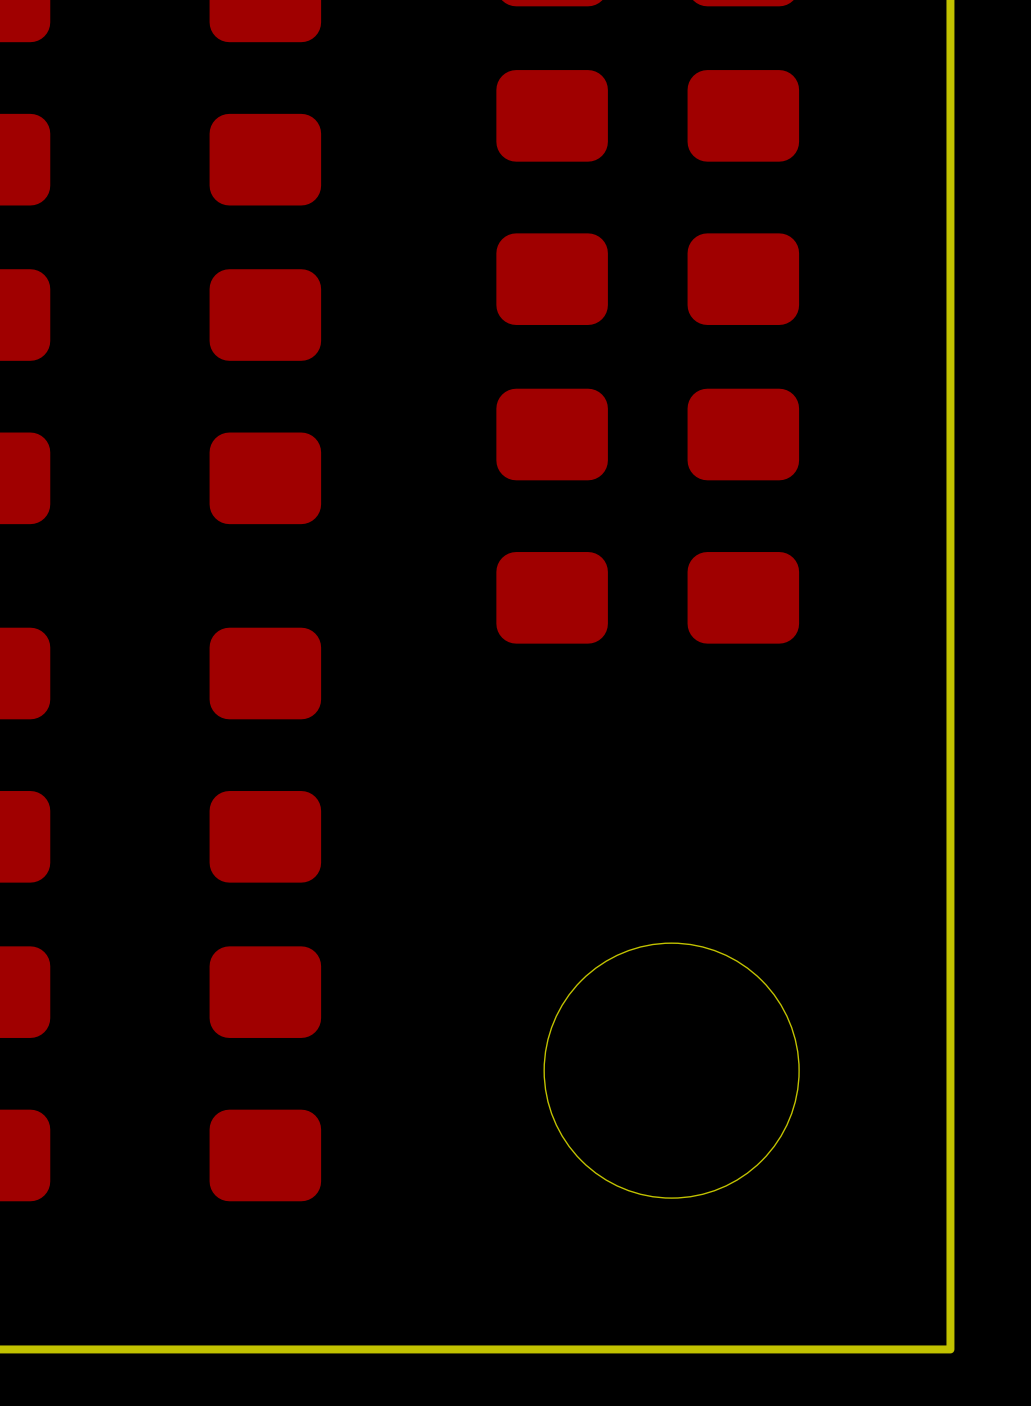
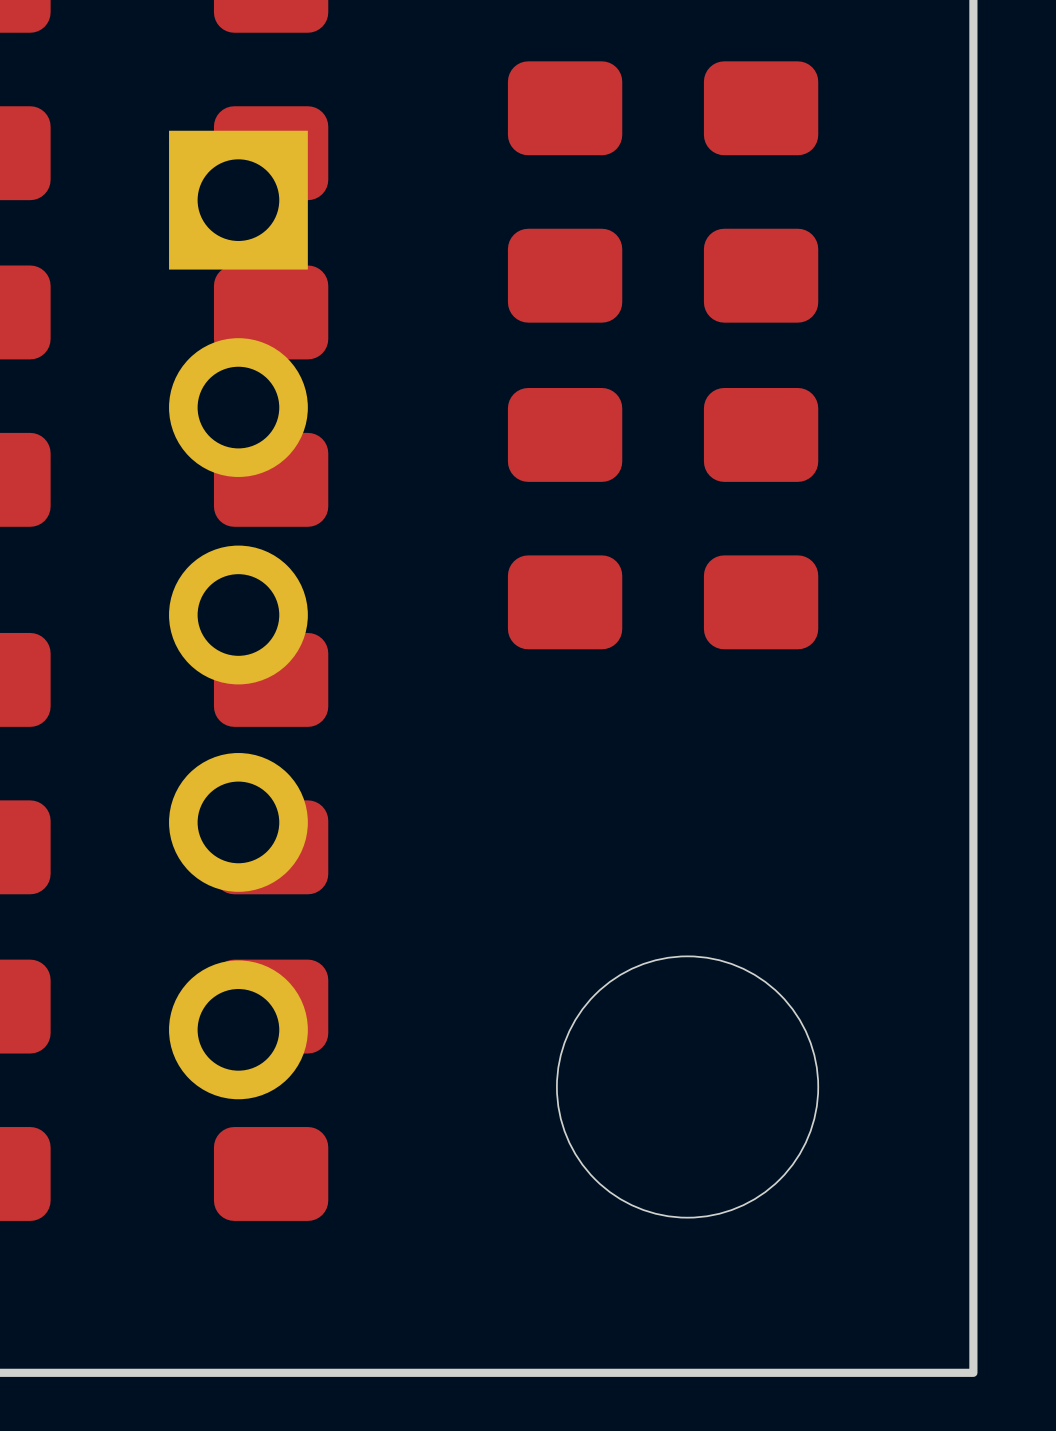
part: none -> (238, 615)

